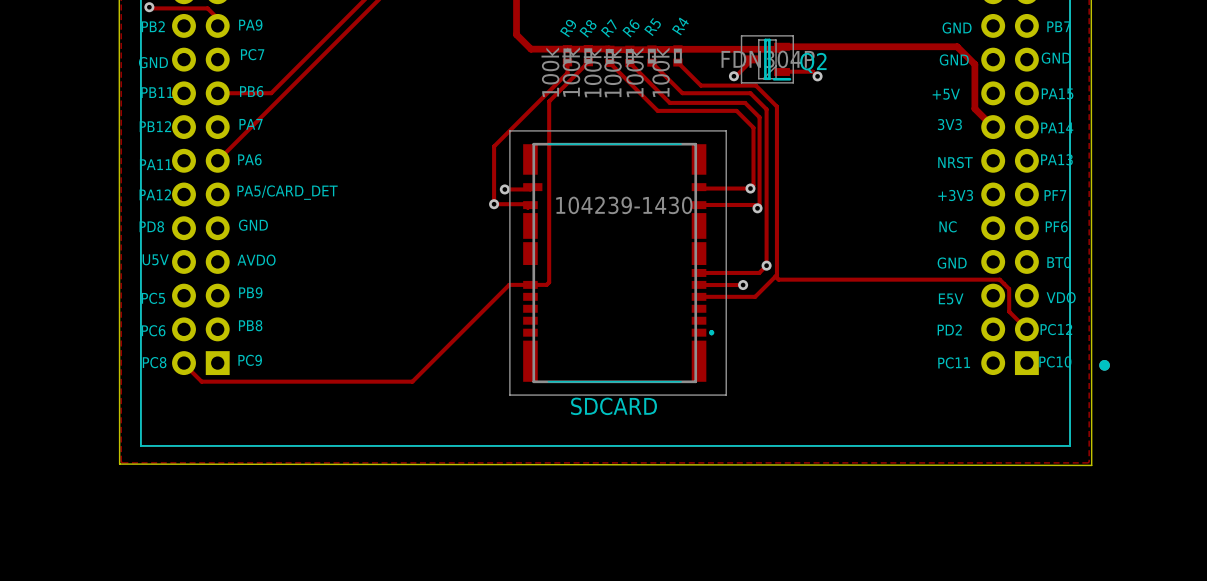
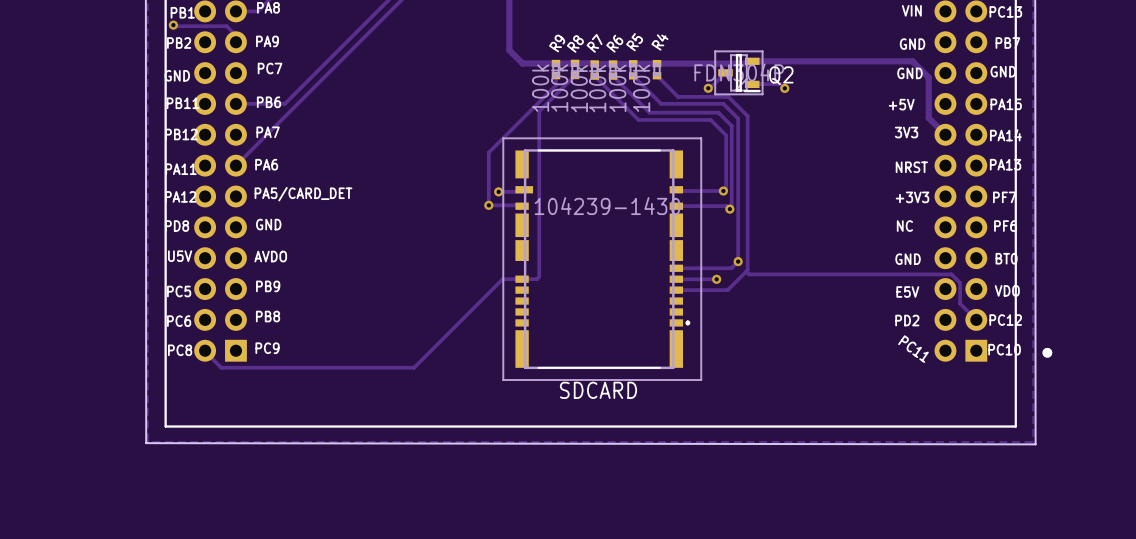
text rotation: 0° (954, 362) -> 36.1° clockwise (913, 349)

